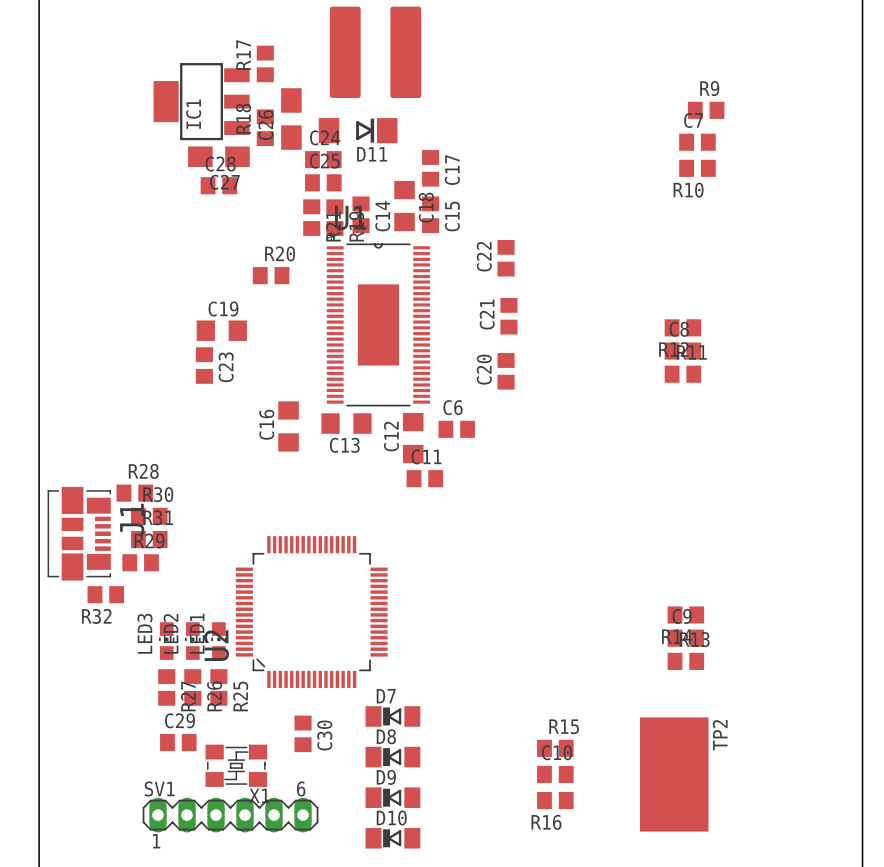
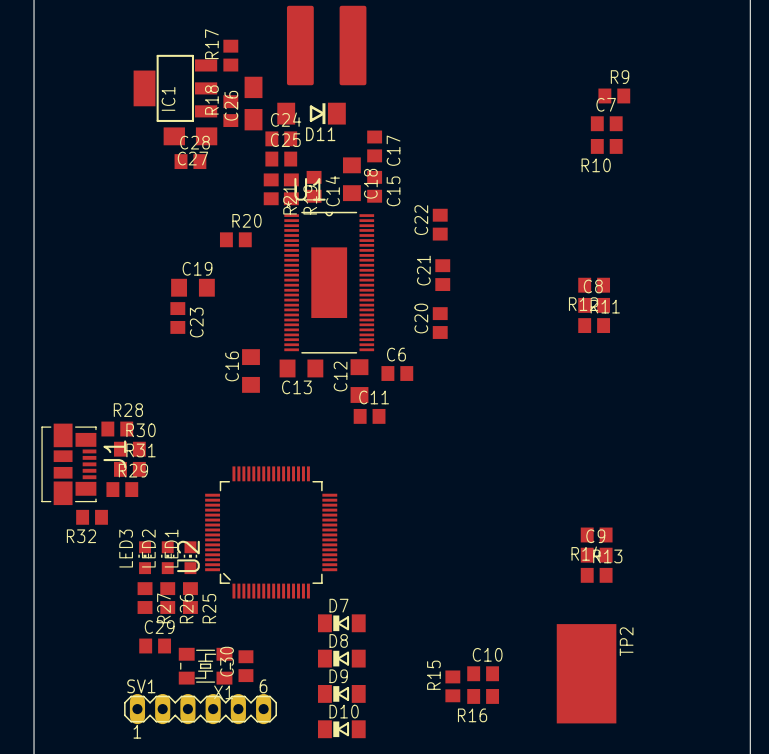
R15 name position: R15 (564, 726) -> R15 (433, 675)
C30 position: (303, 733) -> (245, 666)
C30 name position: C30 (324, 735) -> C30 (227, 661)
R15 rotation: 0° (555, 748) -> 90° clockwise (452, 686)
R15 position: (555, 748) -> (452, 686)

